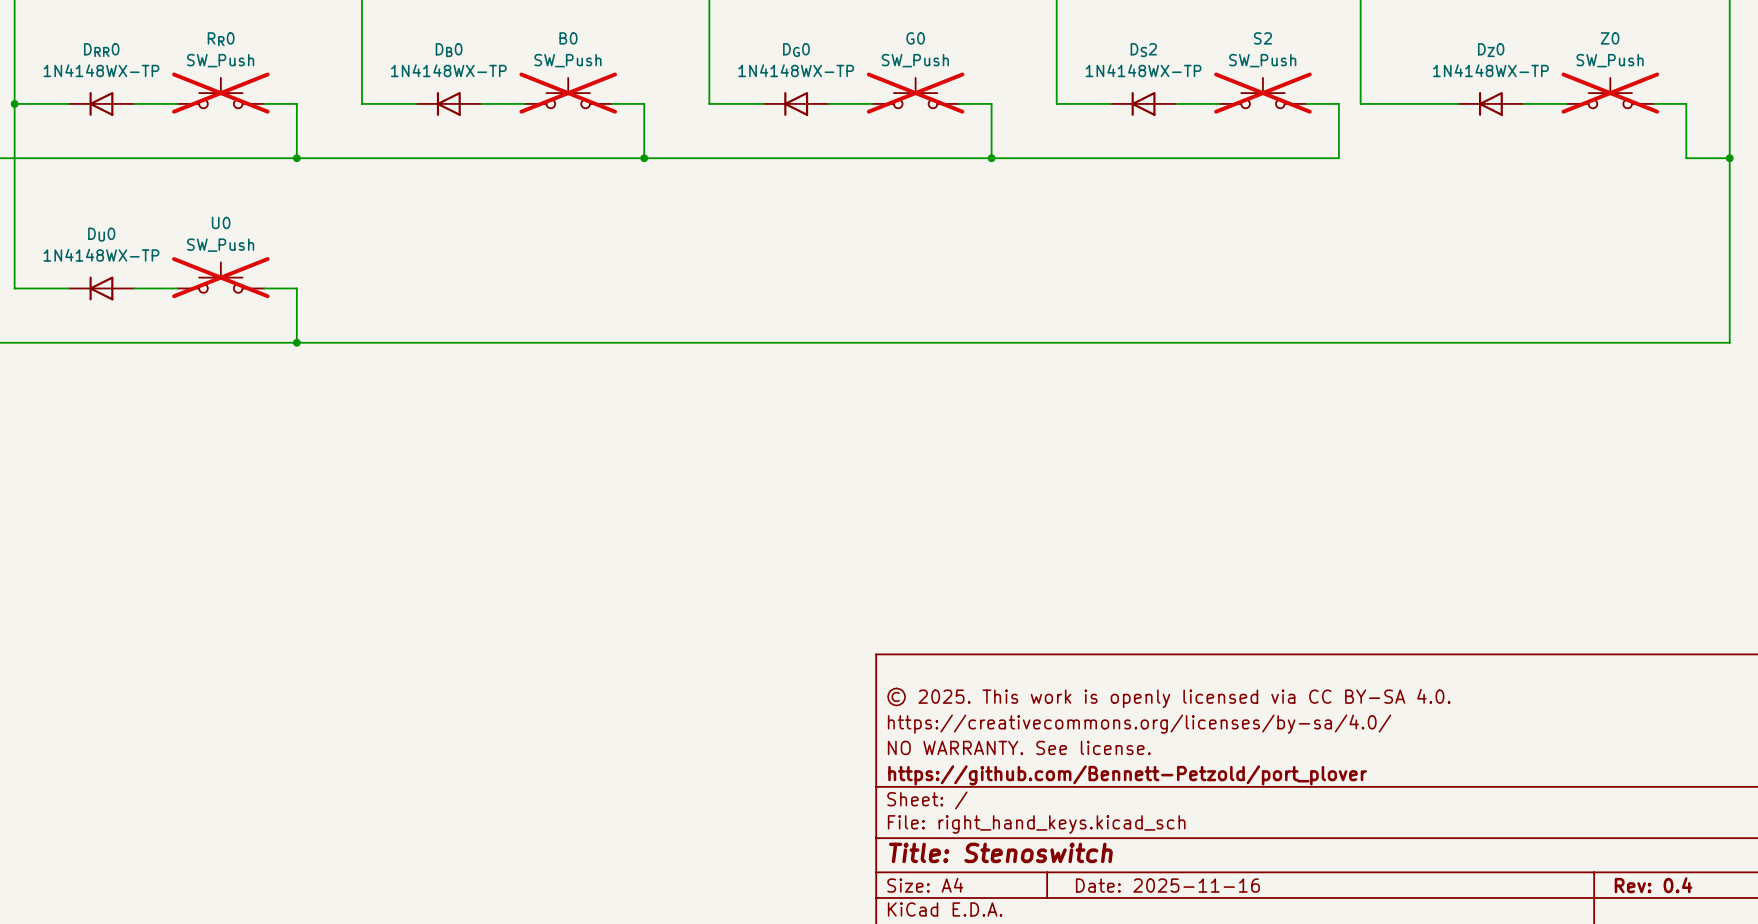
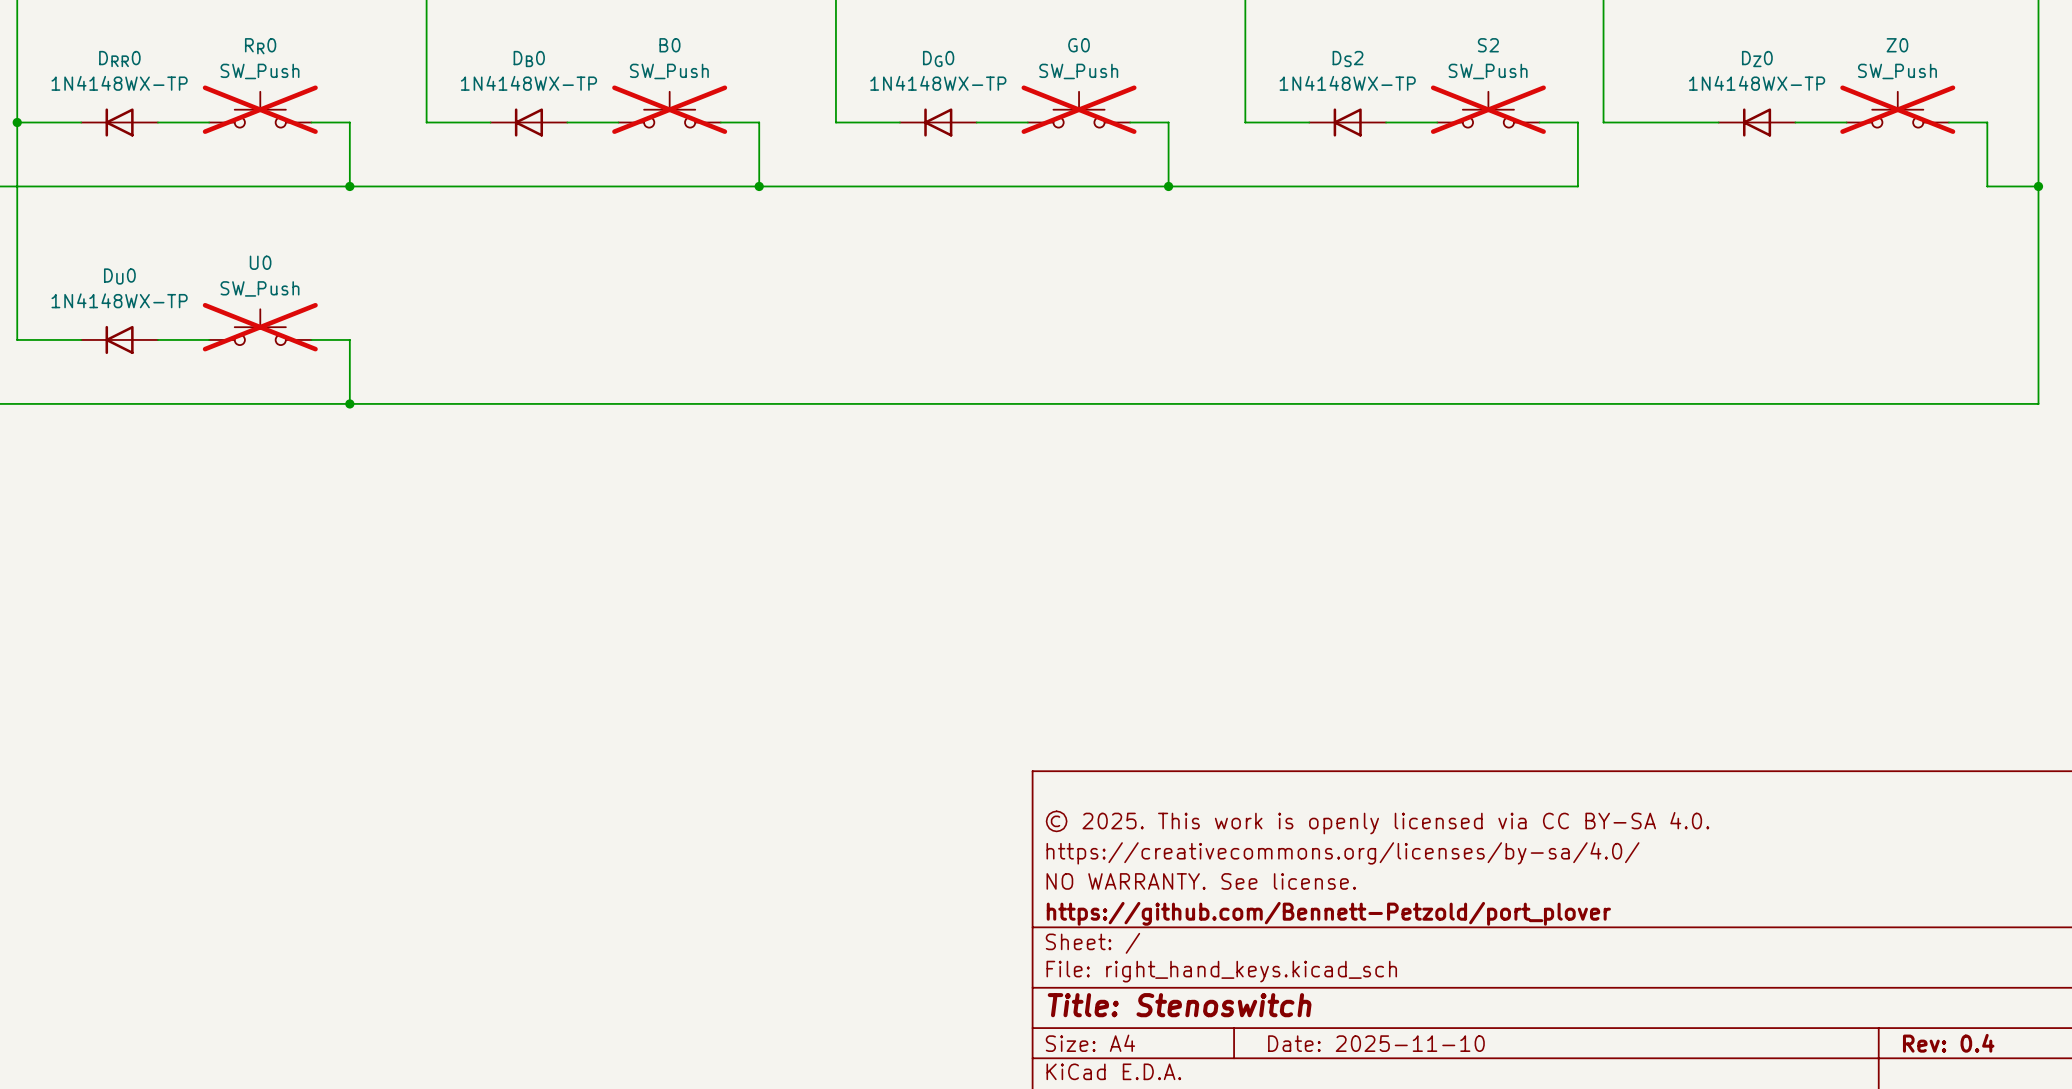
title block: Date: 2025-11-16 (1167, 885) -> Date: 2025-11-10 (1376, 1043)

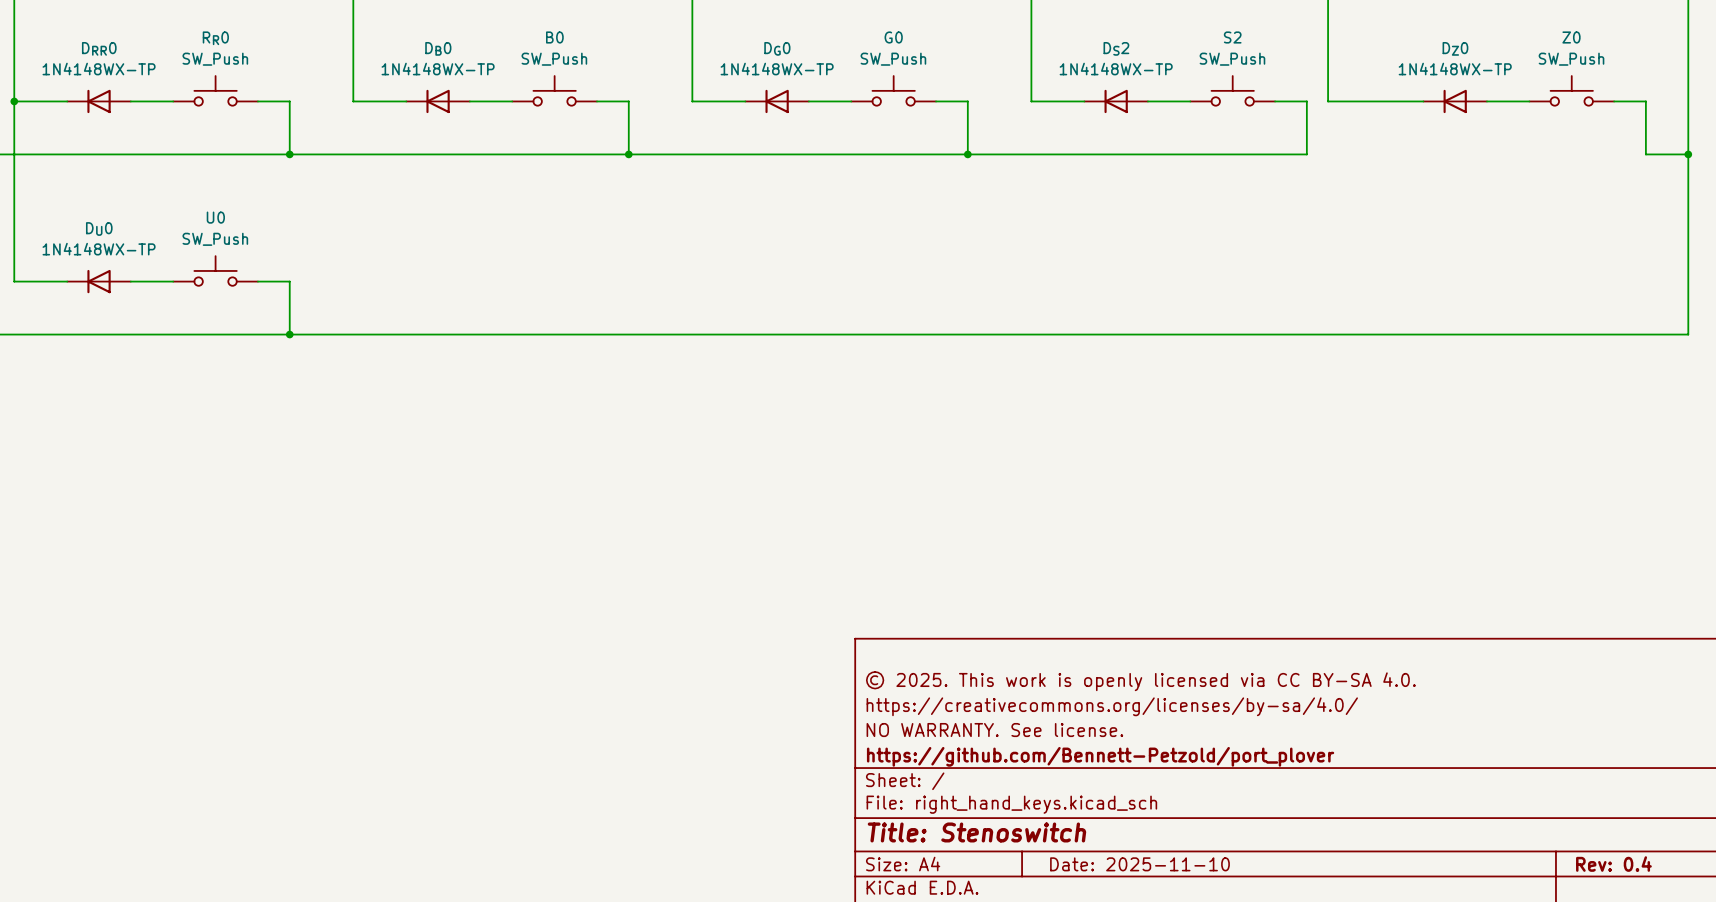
RR0 do-not-place cross: (260, 109) -> none
B0 do-not-place cross: (669, 109) -> none
G0 do-not-place cross: (1079, 109) -> none
S2 do-not-place cross: (1488, 109) -> none
Z0 do-not-place cross: (1897, 109) -> none
U0 do-not-place cross: (260, 327) -> none

